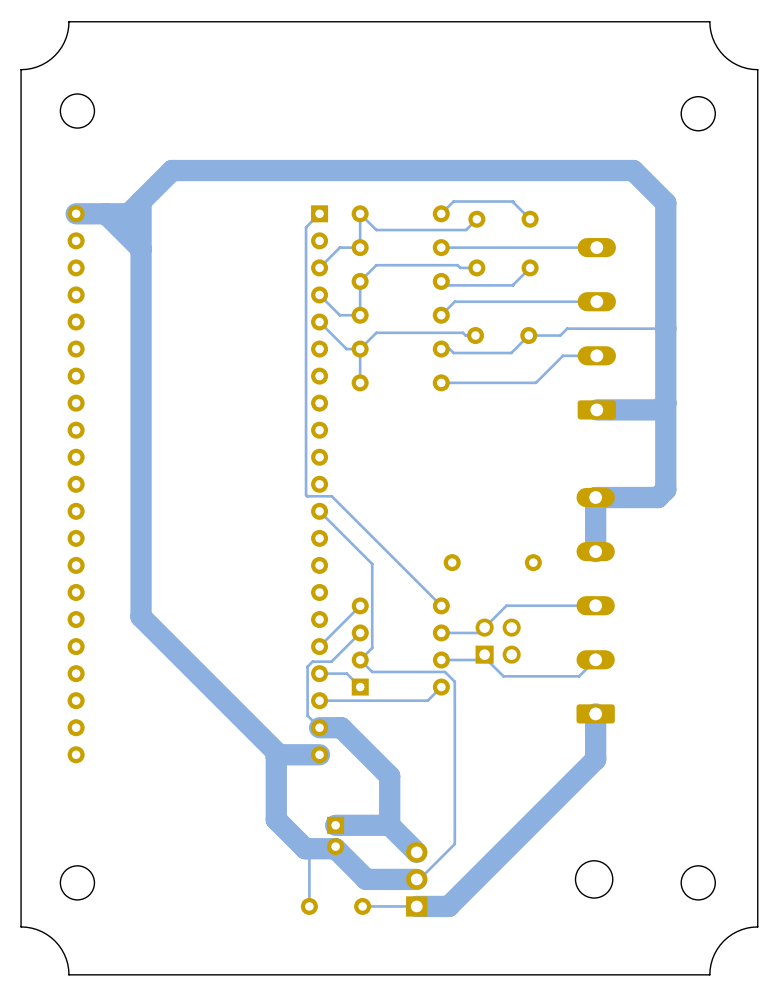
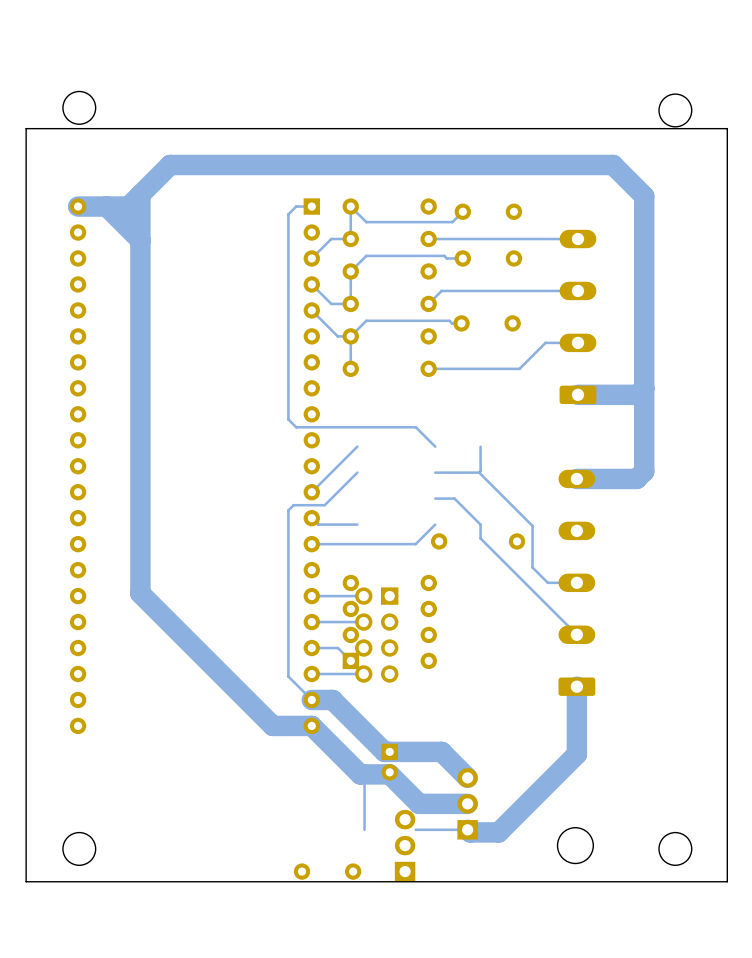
board edge: (709, 21) (68, 21) (64, 42) (54, 55) (41, 64) (21, 69) (21, 926) (41, 931) (54, 940) (64, 954) (68, 974) (709, 974) (714, 954) (723, 940) (736, 931) (757, 926) (757, 69) (736, 64) (723, 55) (714, 42) (709, 21) -> (727, 128) (727, 881) (26, 881) (26, 128) (727, 128)
track: (319, 213) (306, 227) (306, 495) (331, 496) (441, 605) -> (311, 206) (296, 206) (288, 214) (288, 419) (296, 427) (415, 427) (435, 446)
track: (441, 213) (453, 201) (513, 201) (530, 219) -> none
track: (530, 267) (513, 285) (445, 285) (441, 281) -> none
track: (665, 328) (567, 328) (560, 335) (528, 335) (511, 353) (453, 353) (449, 349) (441, 349) -> none
track: none -> (480, 446) (479, 472)
track: none -> (479, 472) (435, 472)
track: (595, 497) (595, 551) -> none
track: (319, 511) (372, 564) (372, 648) (360, 660) (372, 671) (445, 671) (454, 681) (454, 844) (419, 879) (366, 879) (335, 848) (305, 848) -> (311, 492) (357, 446)
track: none -> (311, 518) (318, 524) (357, 524)
track: none -> (435, 524) (415, 544) (311, 544)
track: (360, 605) (319, 646) -> (363, 622) (311, 622)
track: (565, 605) (506, 605) (479, 632) (441, 632) -> (547, 582) (532, 567) (532, 525) (479, 472)
track: (360, 632) (331, 661) (312, 661) (307, 666) (307, 715) -> (357, 472) (324, 505) (293, 505) (288, 510) (288, 676) (300, 688)
part: (498, 641) -> none
track: (595, 659) (579, 676) (503, 676) (484, 657) (484, 654) (479, 660) (441, 660) -> (576, 634) (480, 538) (480, 524) (454, 498) (435, 498)
part: none -> (376, 635)
track: (441, 687) (427, 700) (373, 700) -> none
track: (279, 754) (276, 757) (276, 819) (305, 848) -> none
track: none -> (311, 725) (360, 774)
track: (595, 759) (448, 906) (362, 906) -> (576, 730) (576, 754) (498, 832) (470, 832) (467, 829) (415, 829)
track: (389, 776) (389, 825) -> (379, 746) (384, 751) (441, 751) (467, 777)
track: none -> (360, 774) (364, 778) (364, 829)
track: none -> (360, 774) (389, 774) (419, 803) (467, 803)
track: (389, 825) (335, 825) -> (363, 596) (311, 596)
track: (389, 825) (416, 852) -> none
part position: (335, 835) -> (389, 762)
part: none -> (467, 803)
track: (305, 848) (309, 852) (309, 906) -> none

